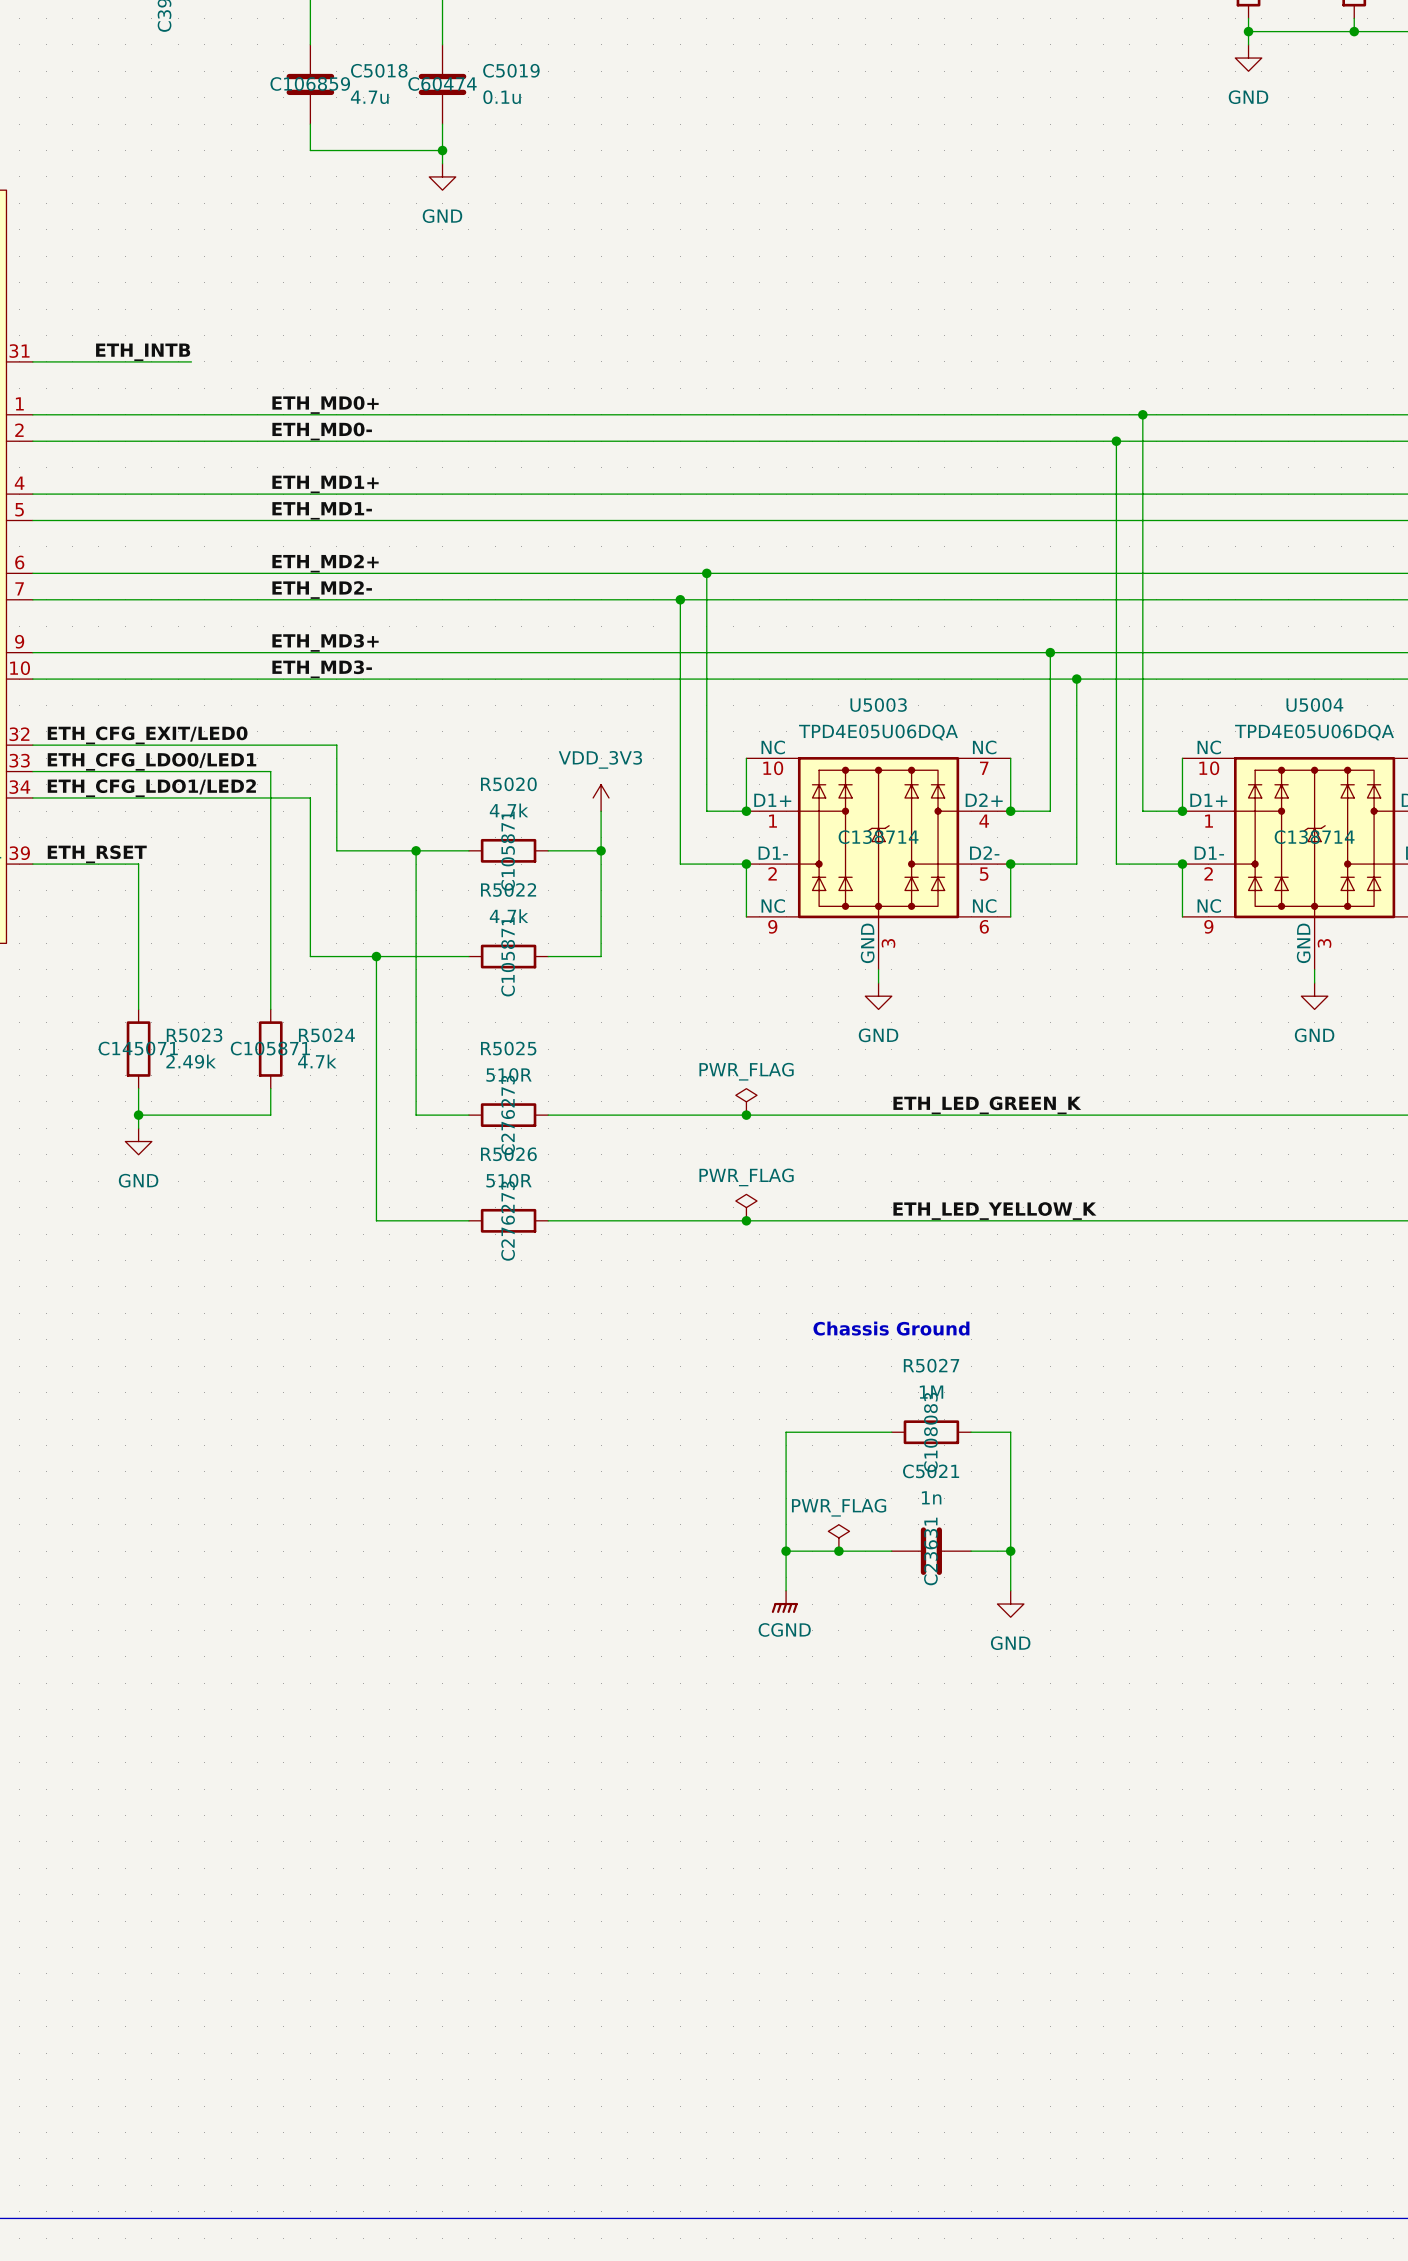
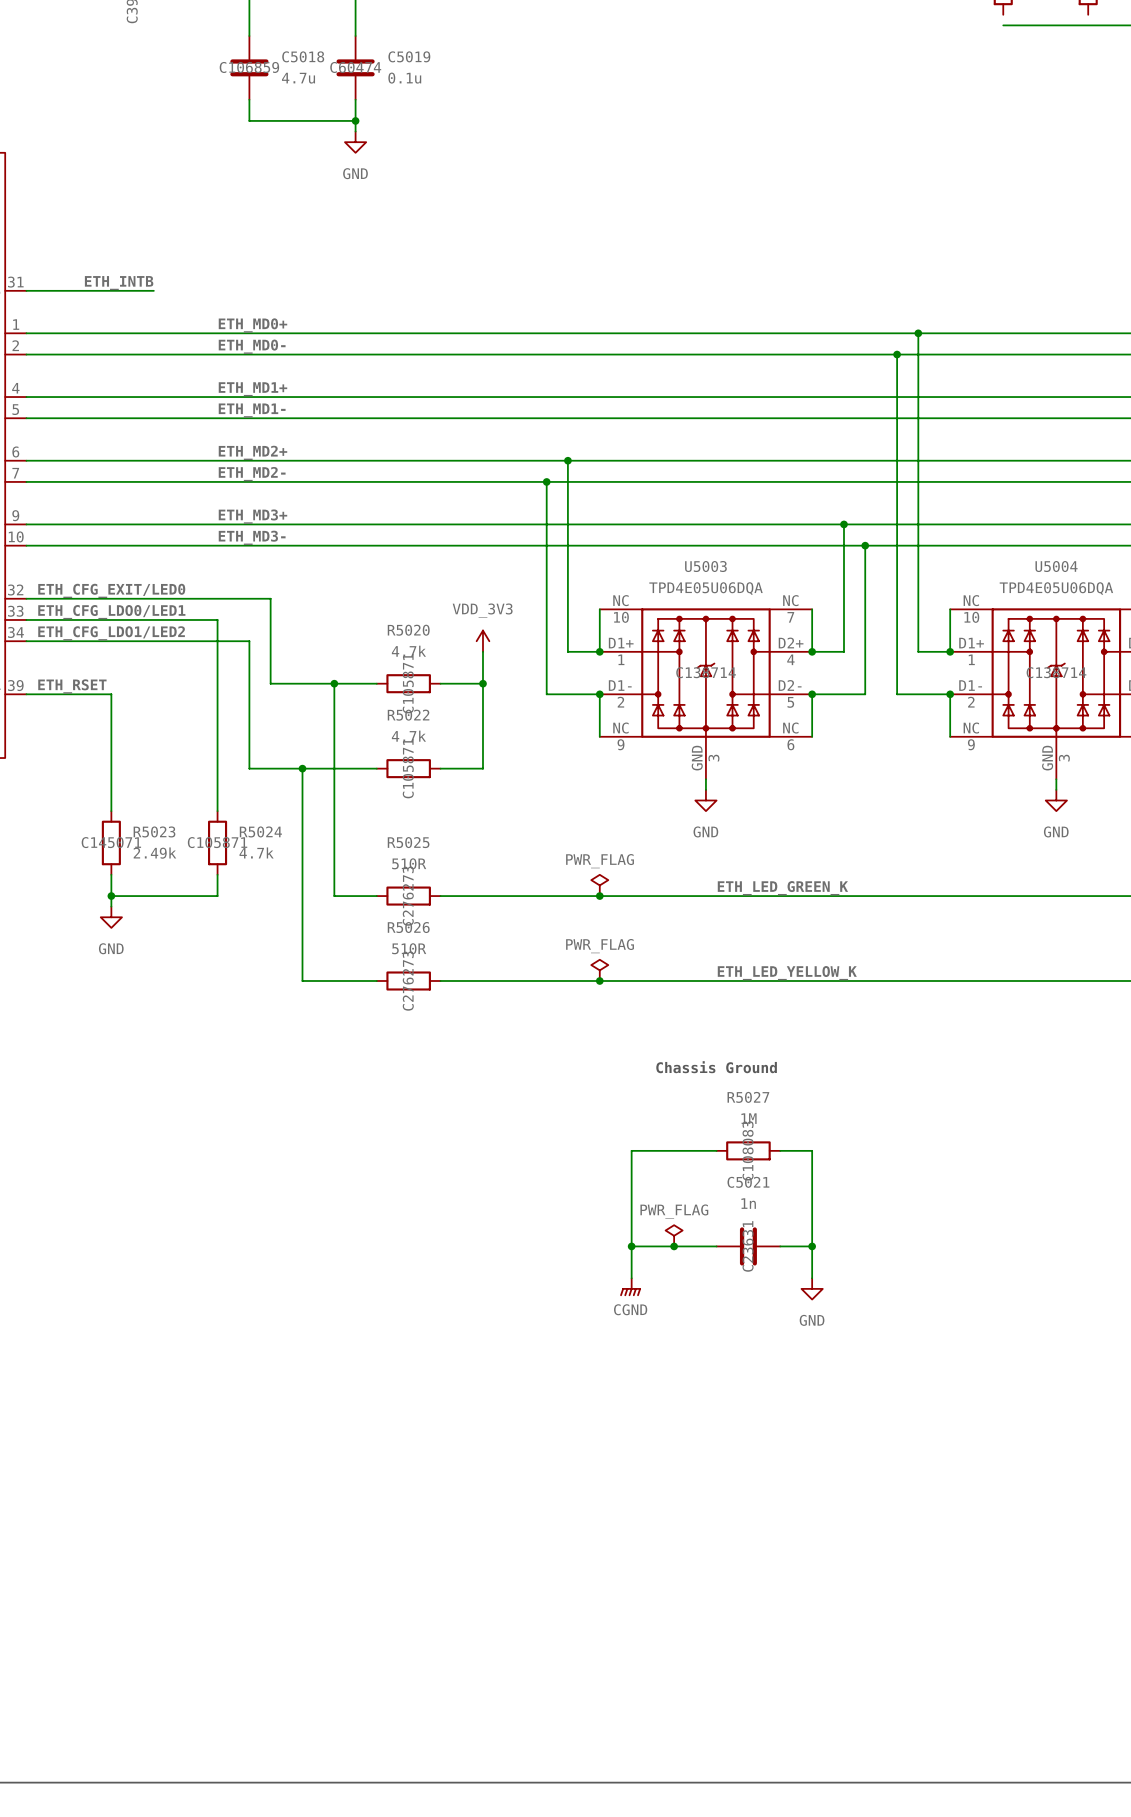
wire: (1248, 18) (1248, 44) -> none
wire: (1354, 18) (1354, 31) -> none
junction: (1248, 31) -> none
junction: (1354, 31) -> none
power symbol: GND (1248, 58) -> none

